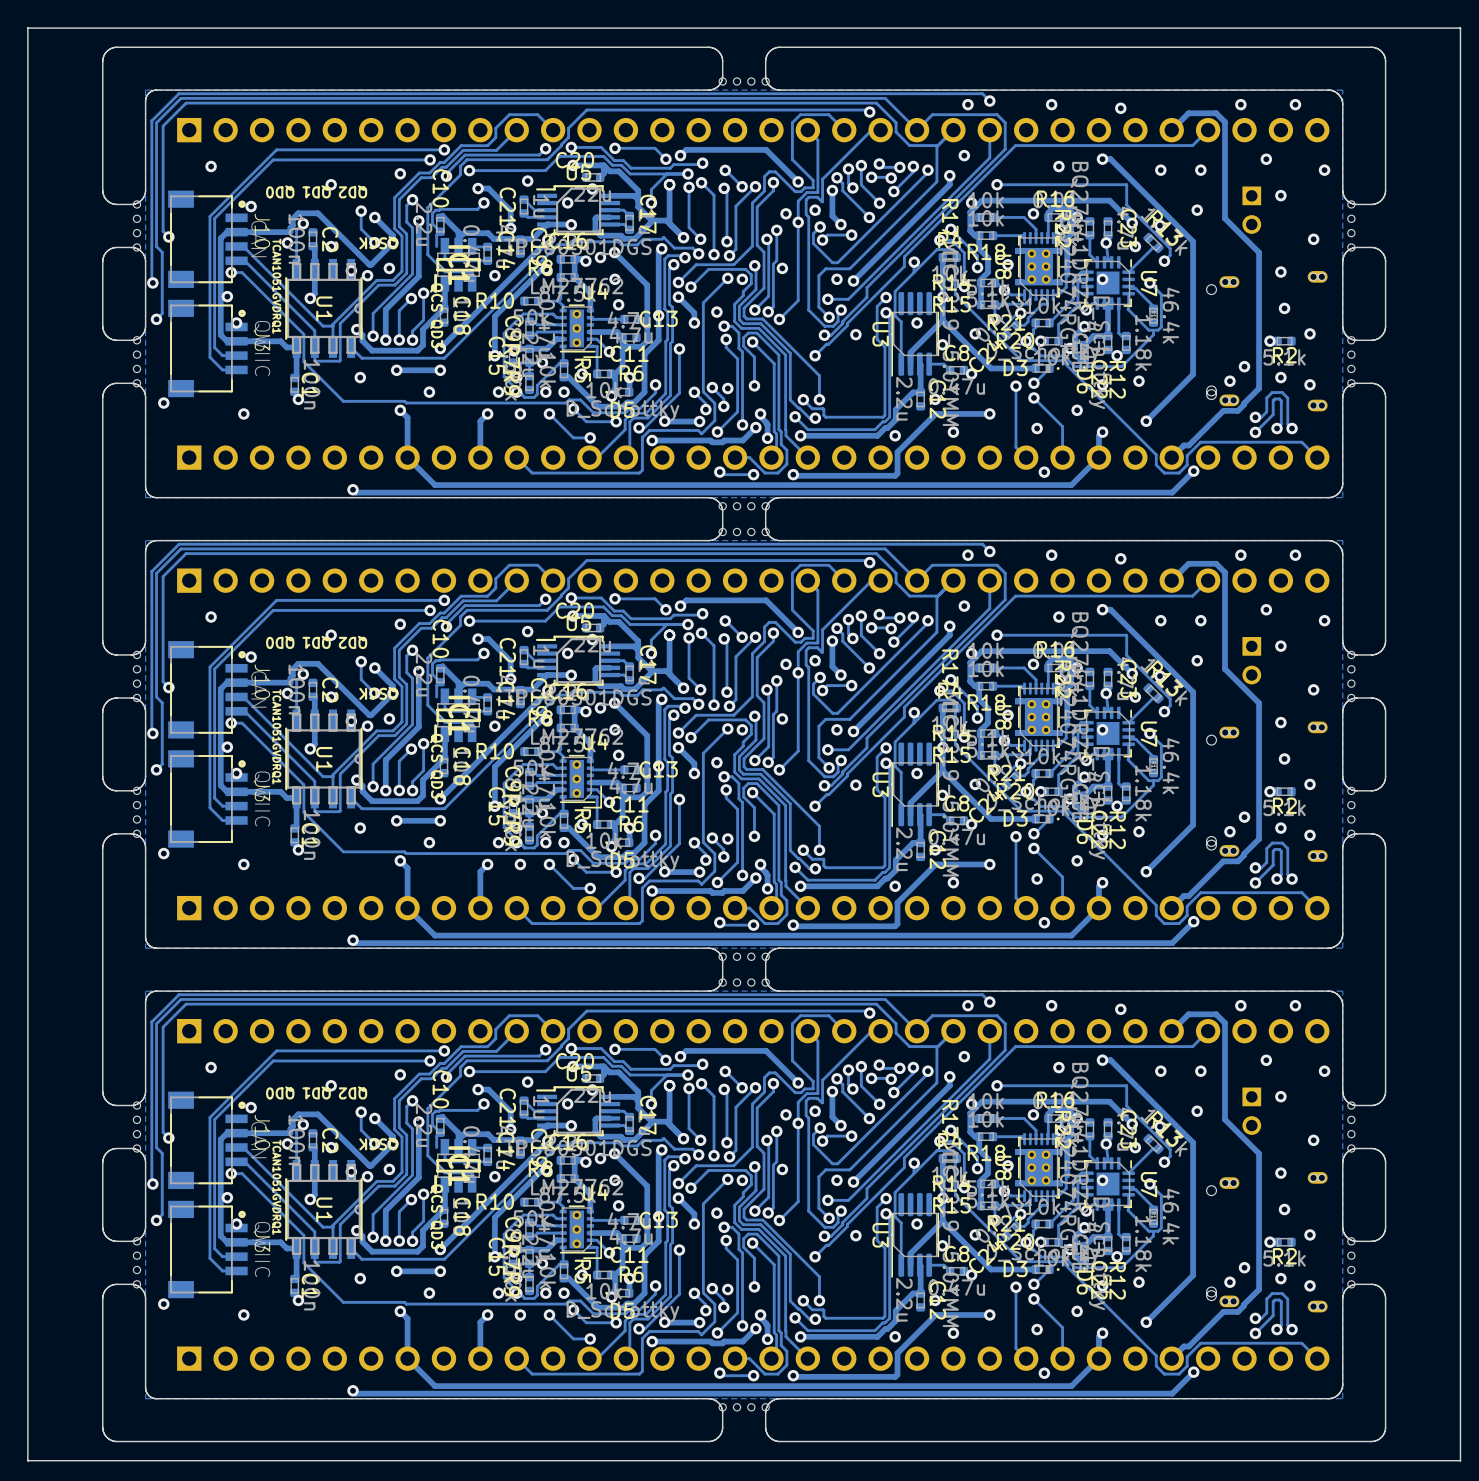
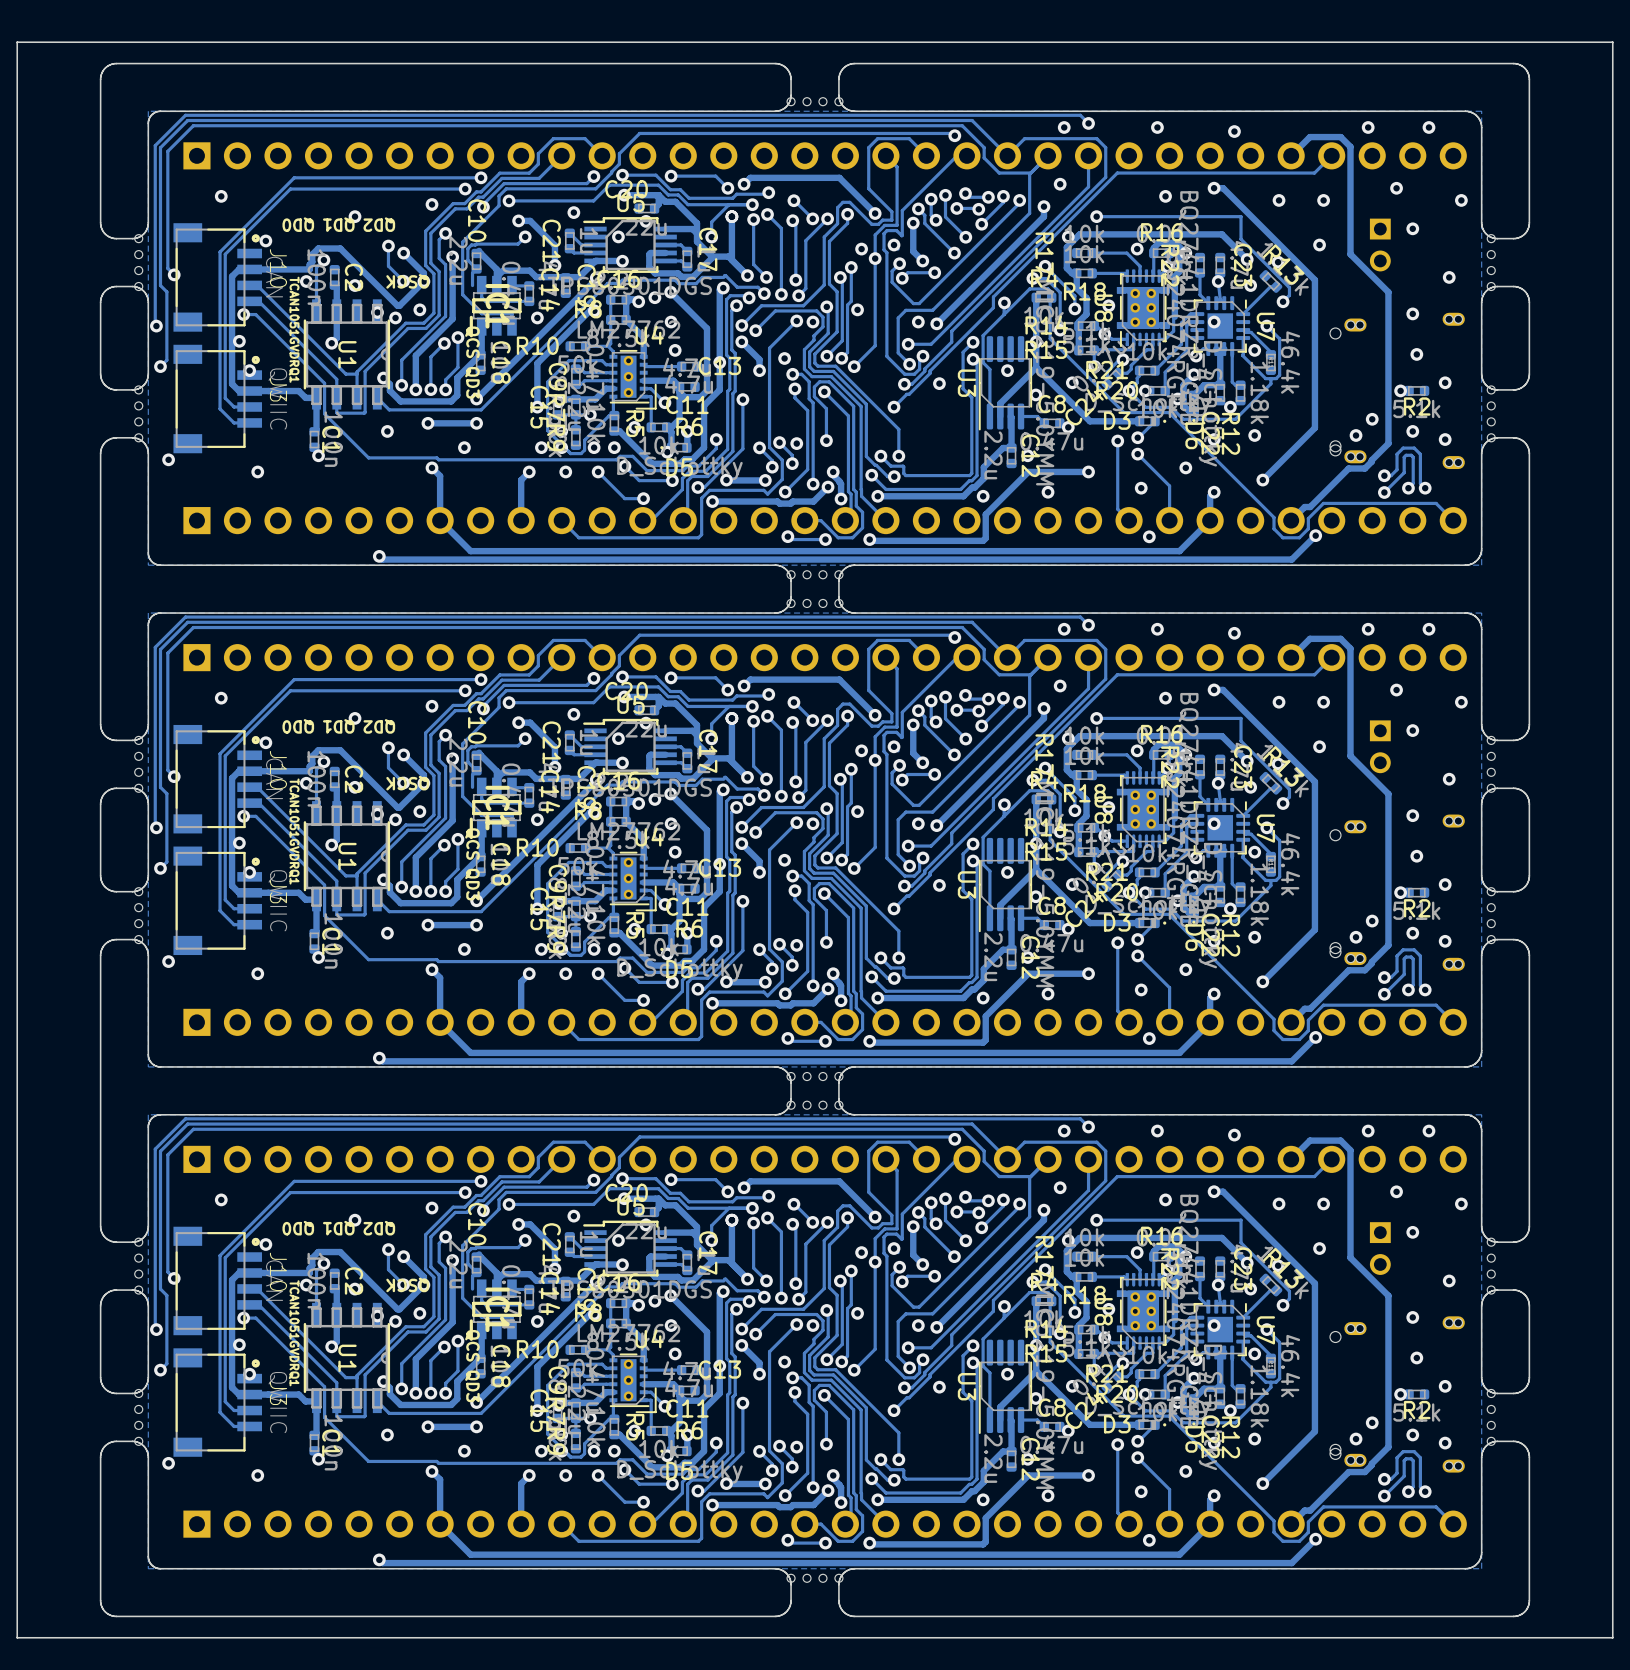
via: none -> (1254, 350)
via: none -> (1254, 852)
via: none -> (1254, 1353)

